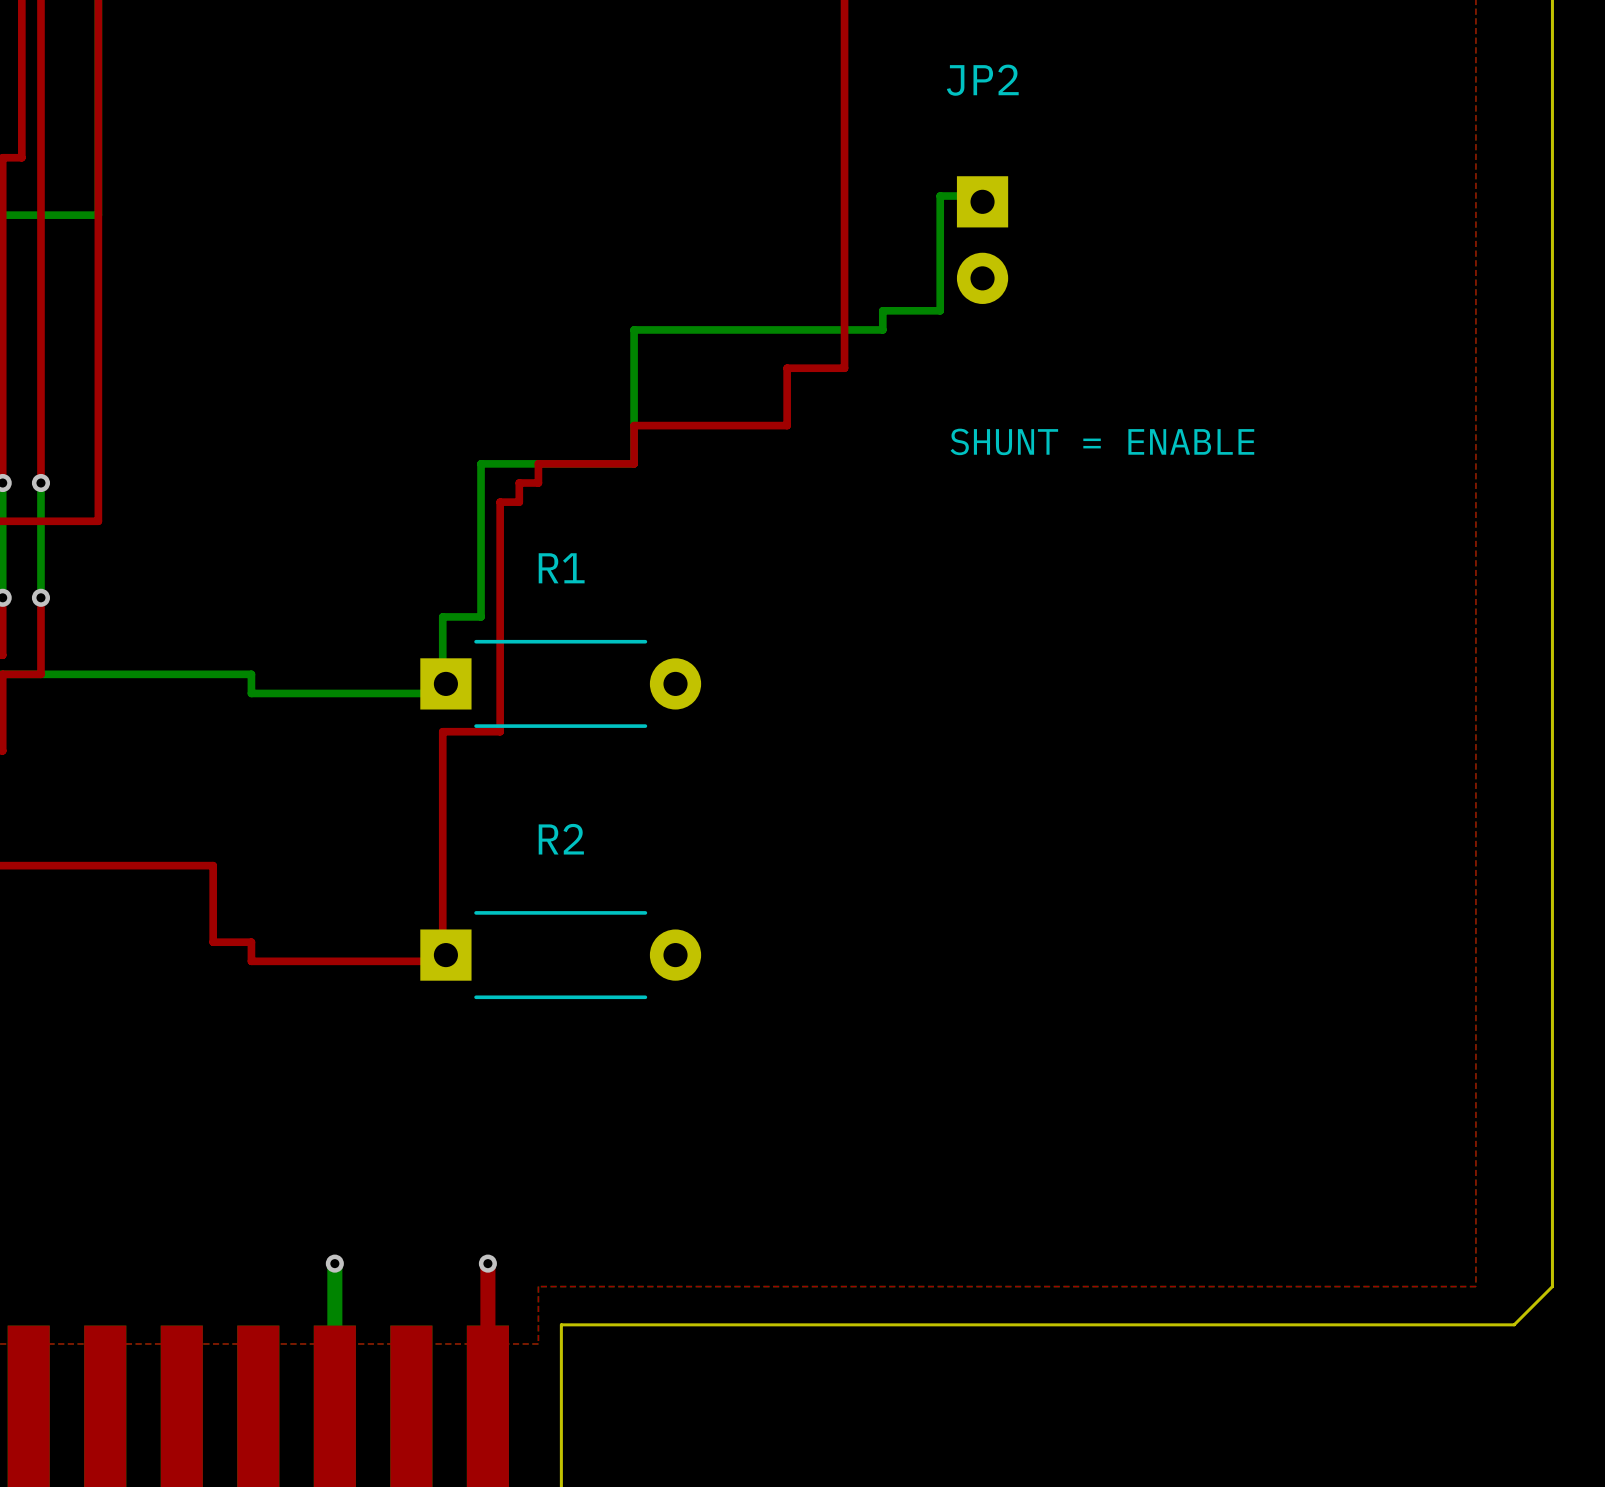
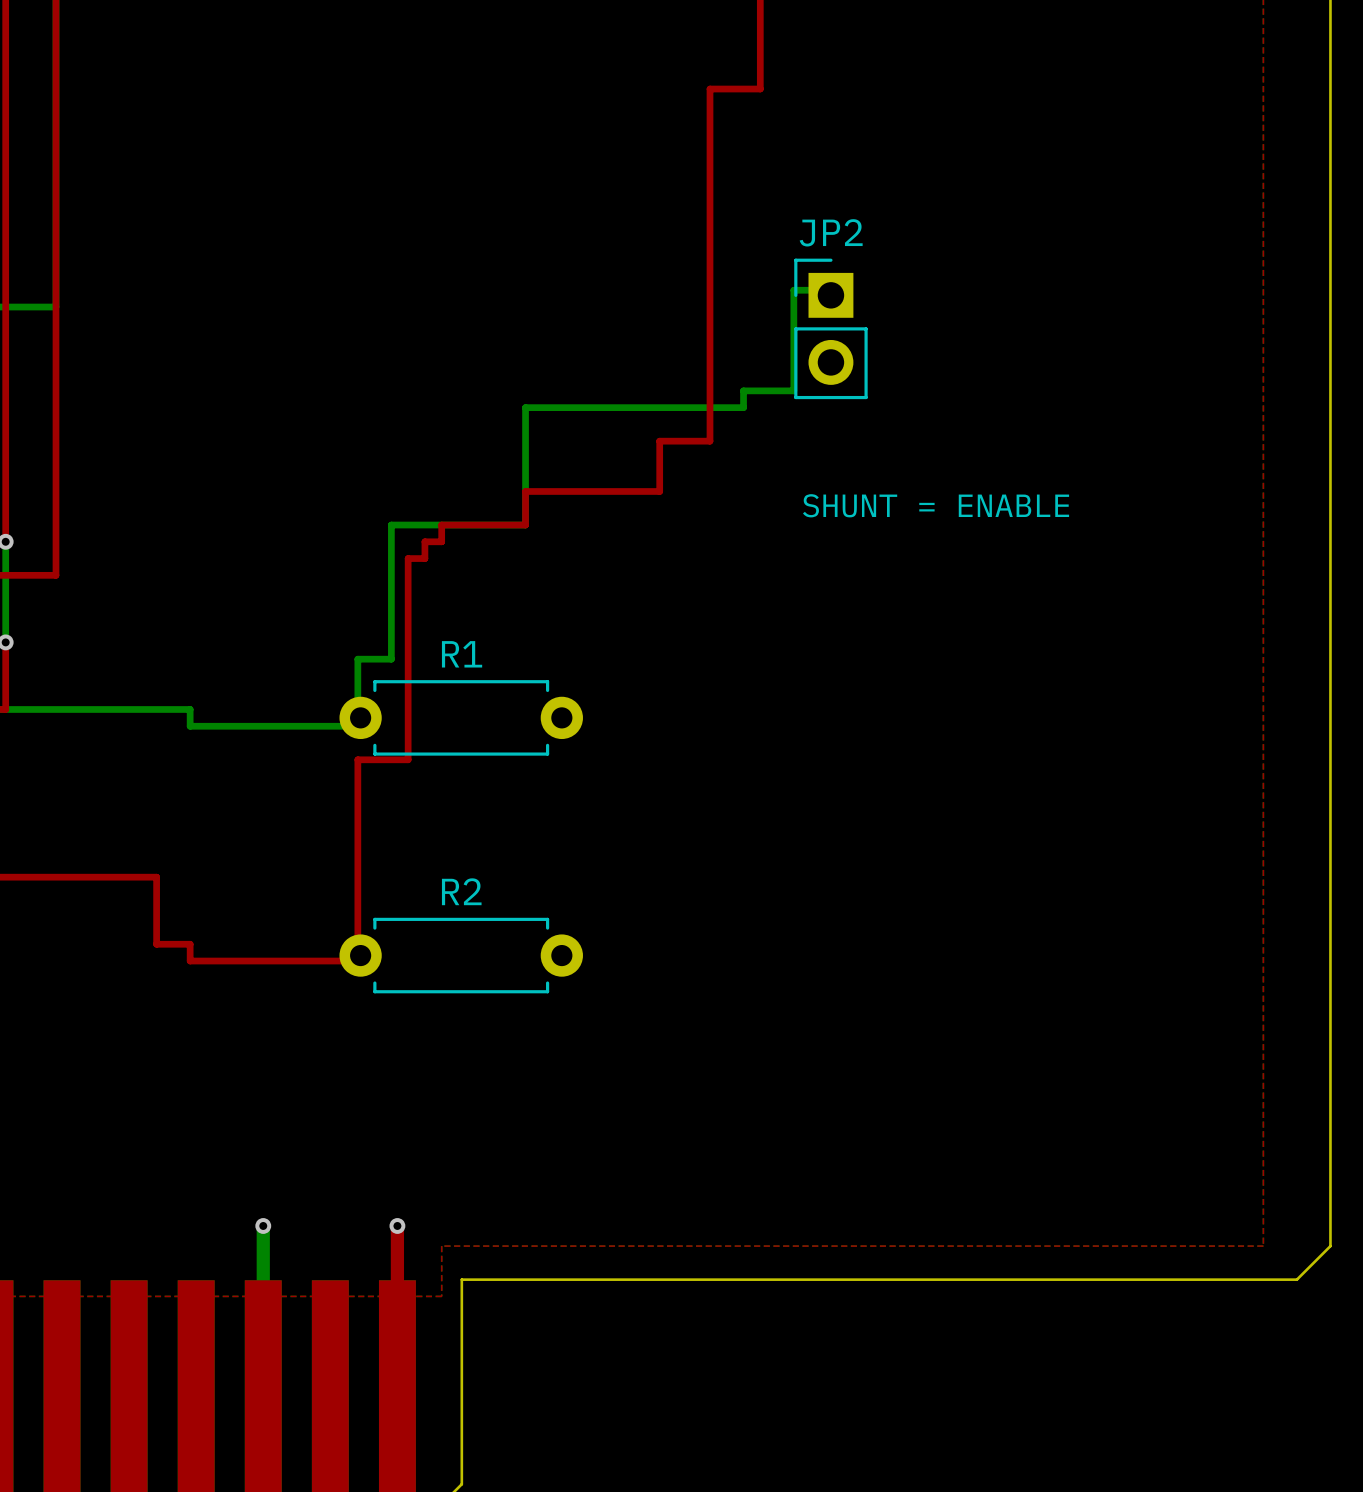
JP2 footprint: [956, 176, 1009, 304] -> [794, 258, 868, 400]
R1 name position: R1 (561, 568) -> R1 (462, 654)
R1 footprint: [420, 639, 702, 728] -> [339, 680, 583, 756]
R2 name position: R2 (561, 839) -> R2 (461, 891)
R2 footprint: [420, 911, 702, 1000] -> [339, 917, 583, 994]

